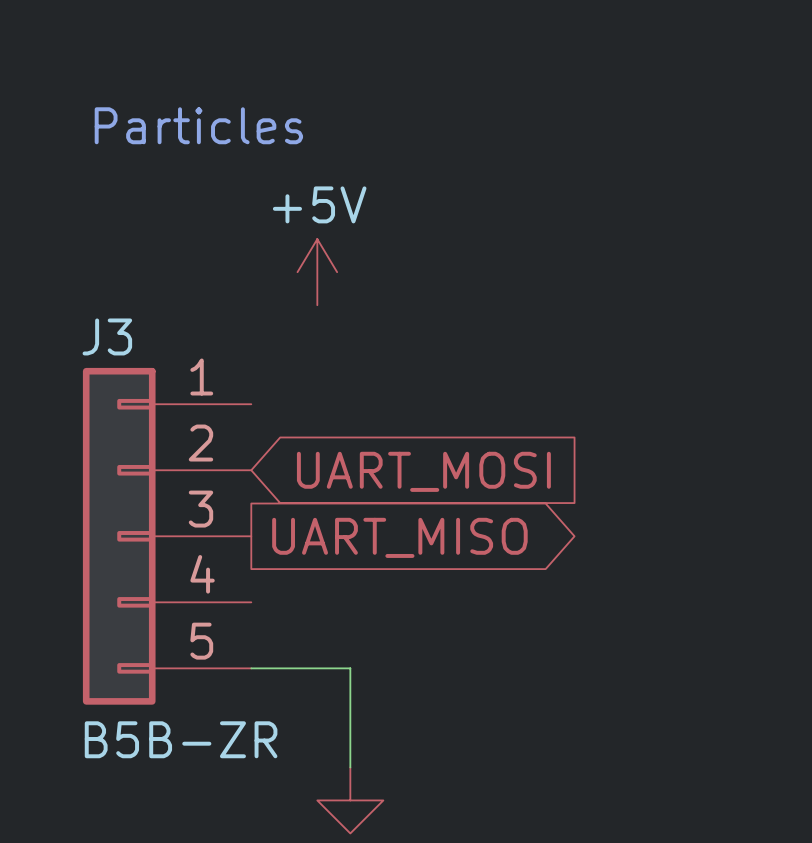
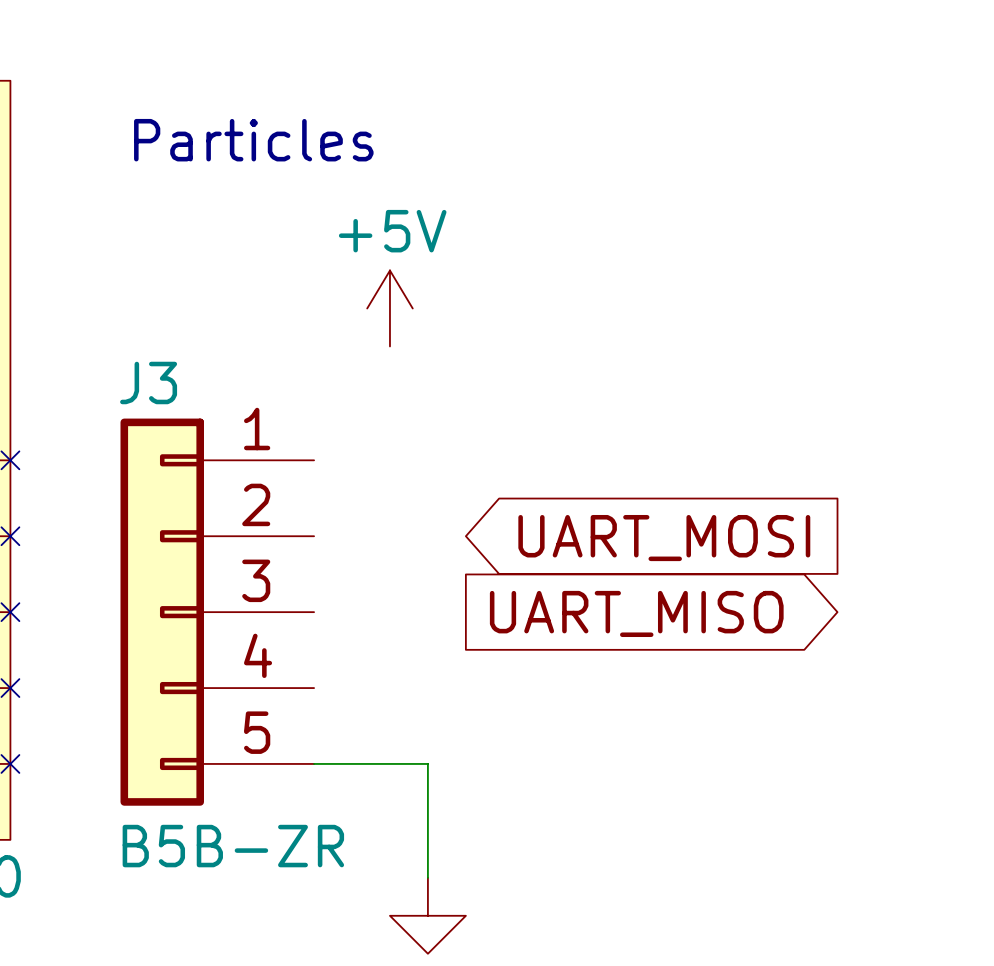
global label position: UART_MOSI (423, 471) -> UART_MOSI (664, 538)
global label position: UART_MISO (399, 537) -> UART_MISO (636, 613)

